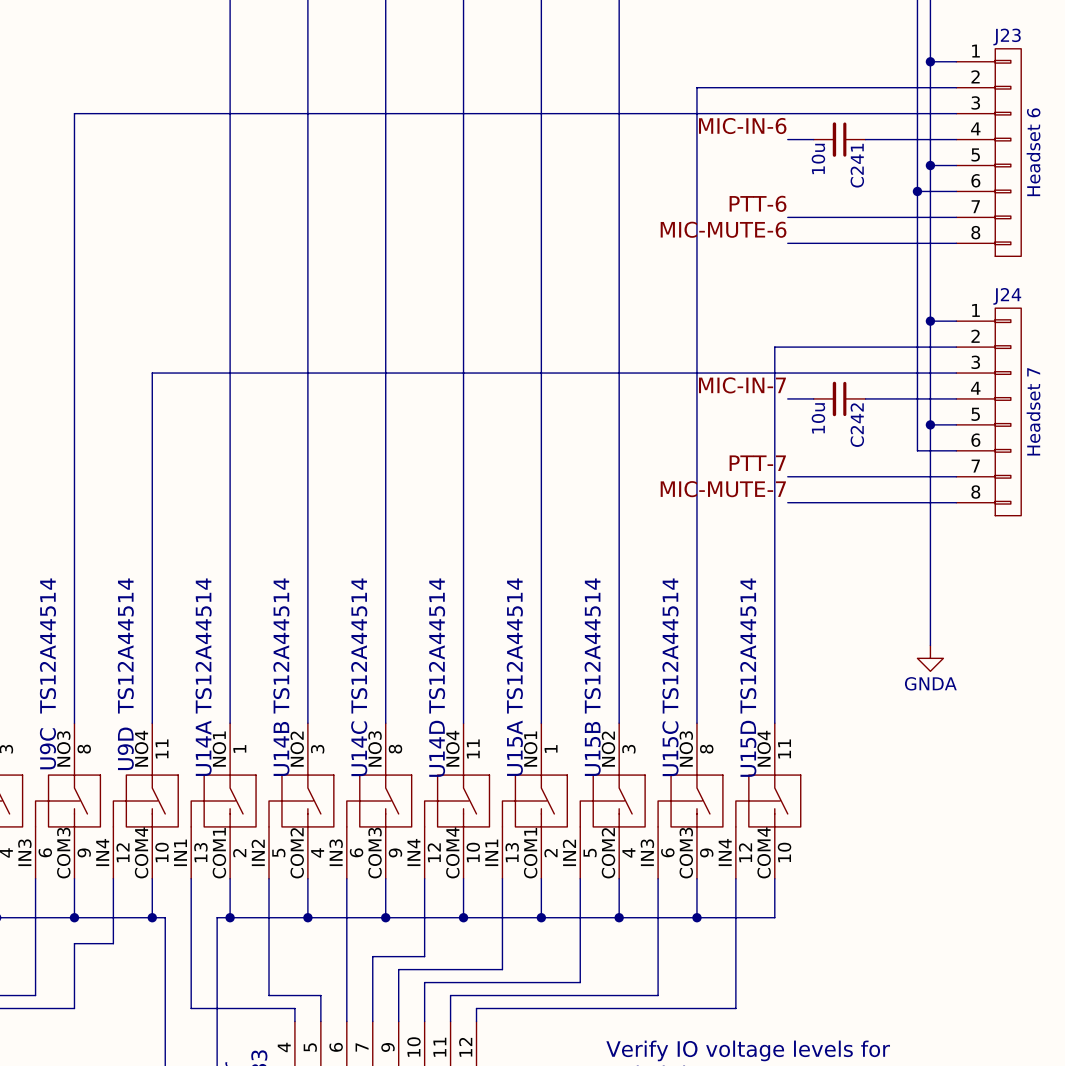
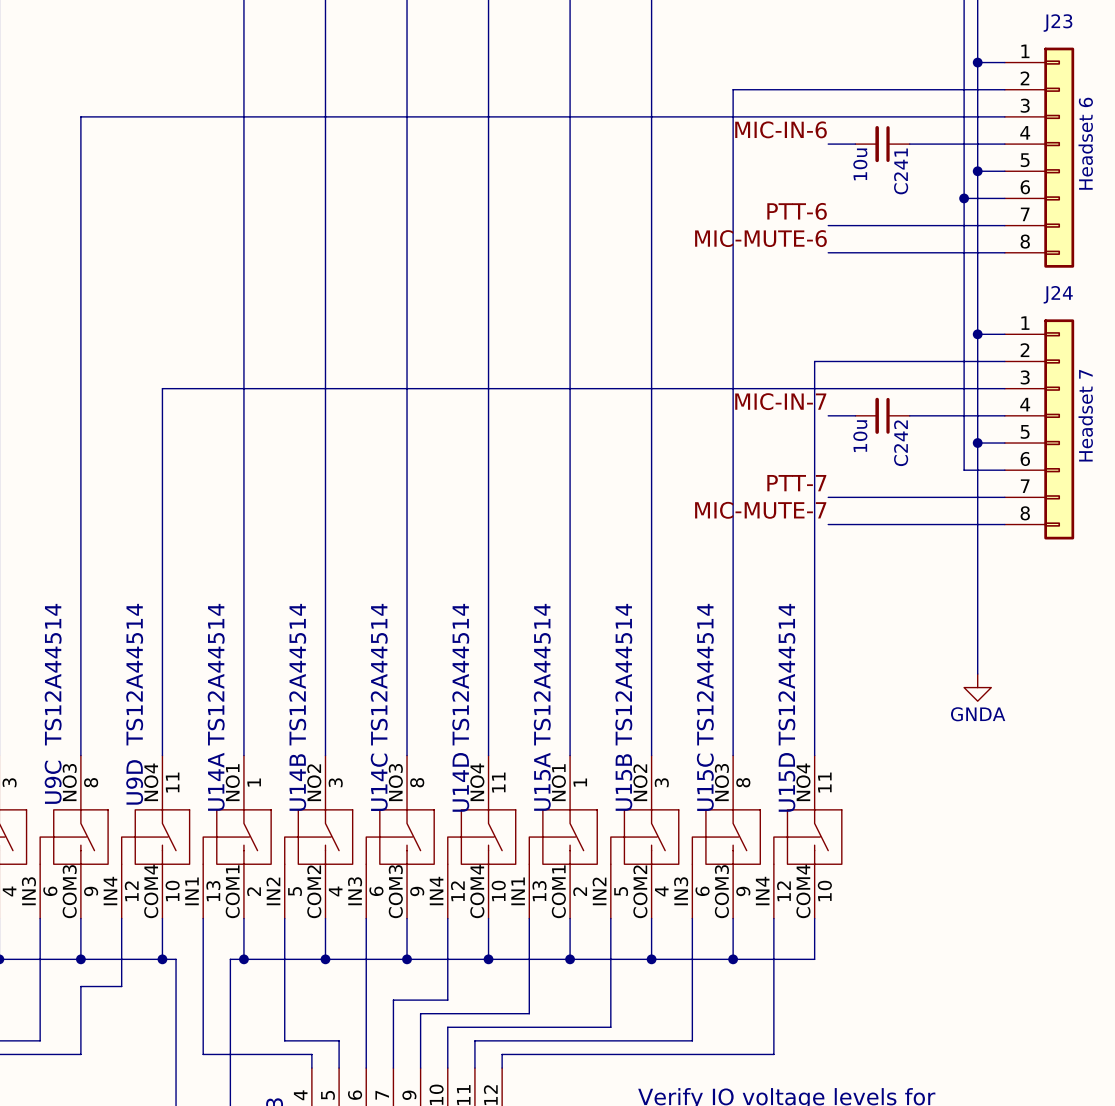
J23 symbol: [956, 48, 1022, 257] -> [1004, 47, 1075, 268]
J24 symbol: [956, 308, 1022, 516] -> [1004, 319, 1075, 540]

